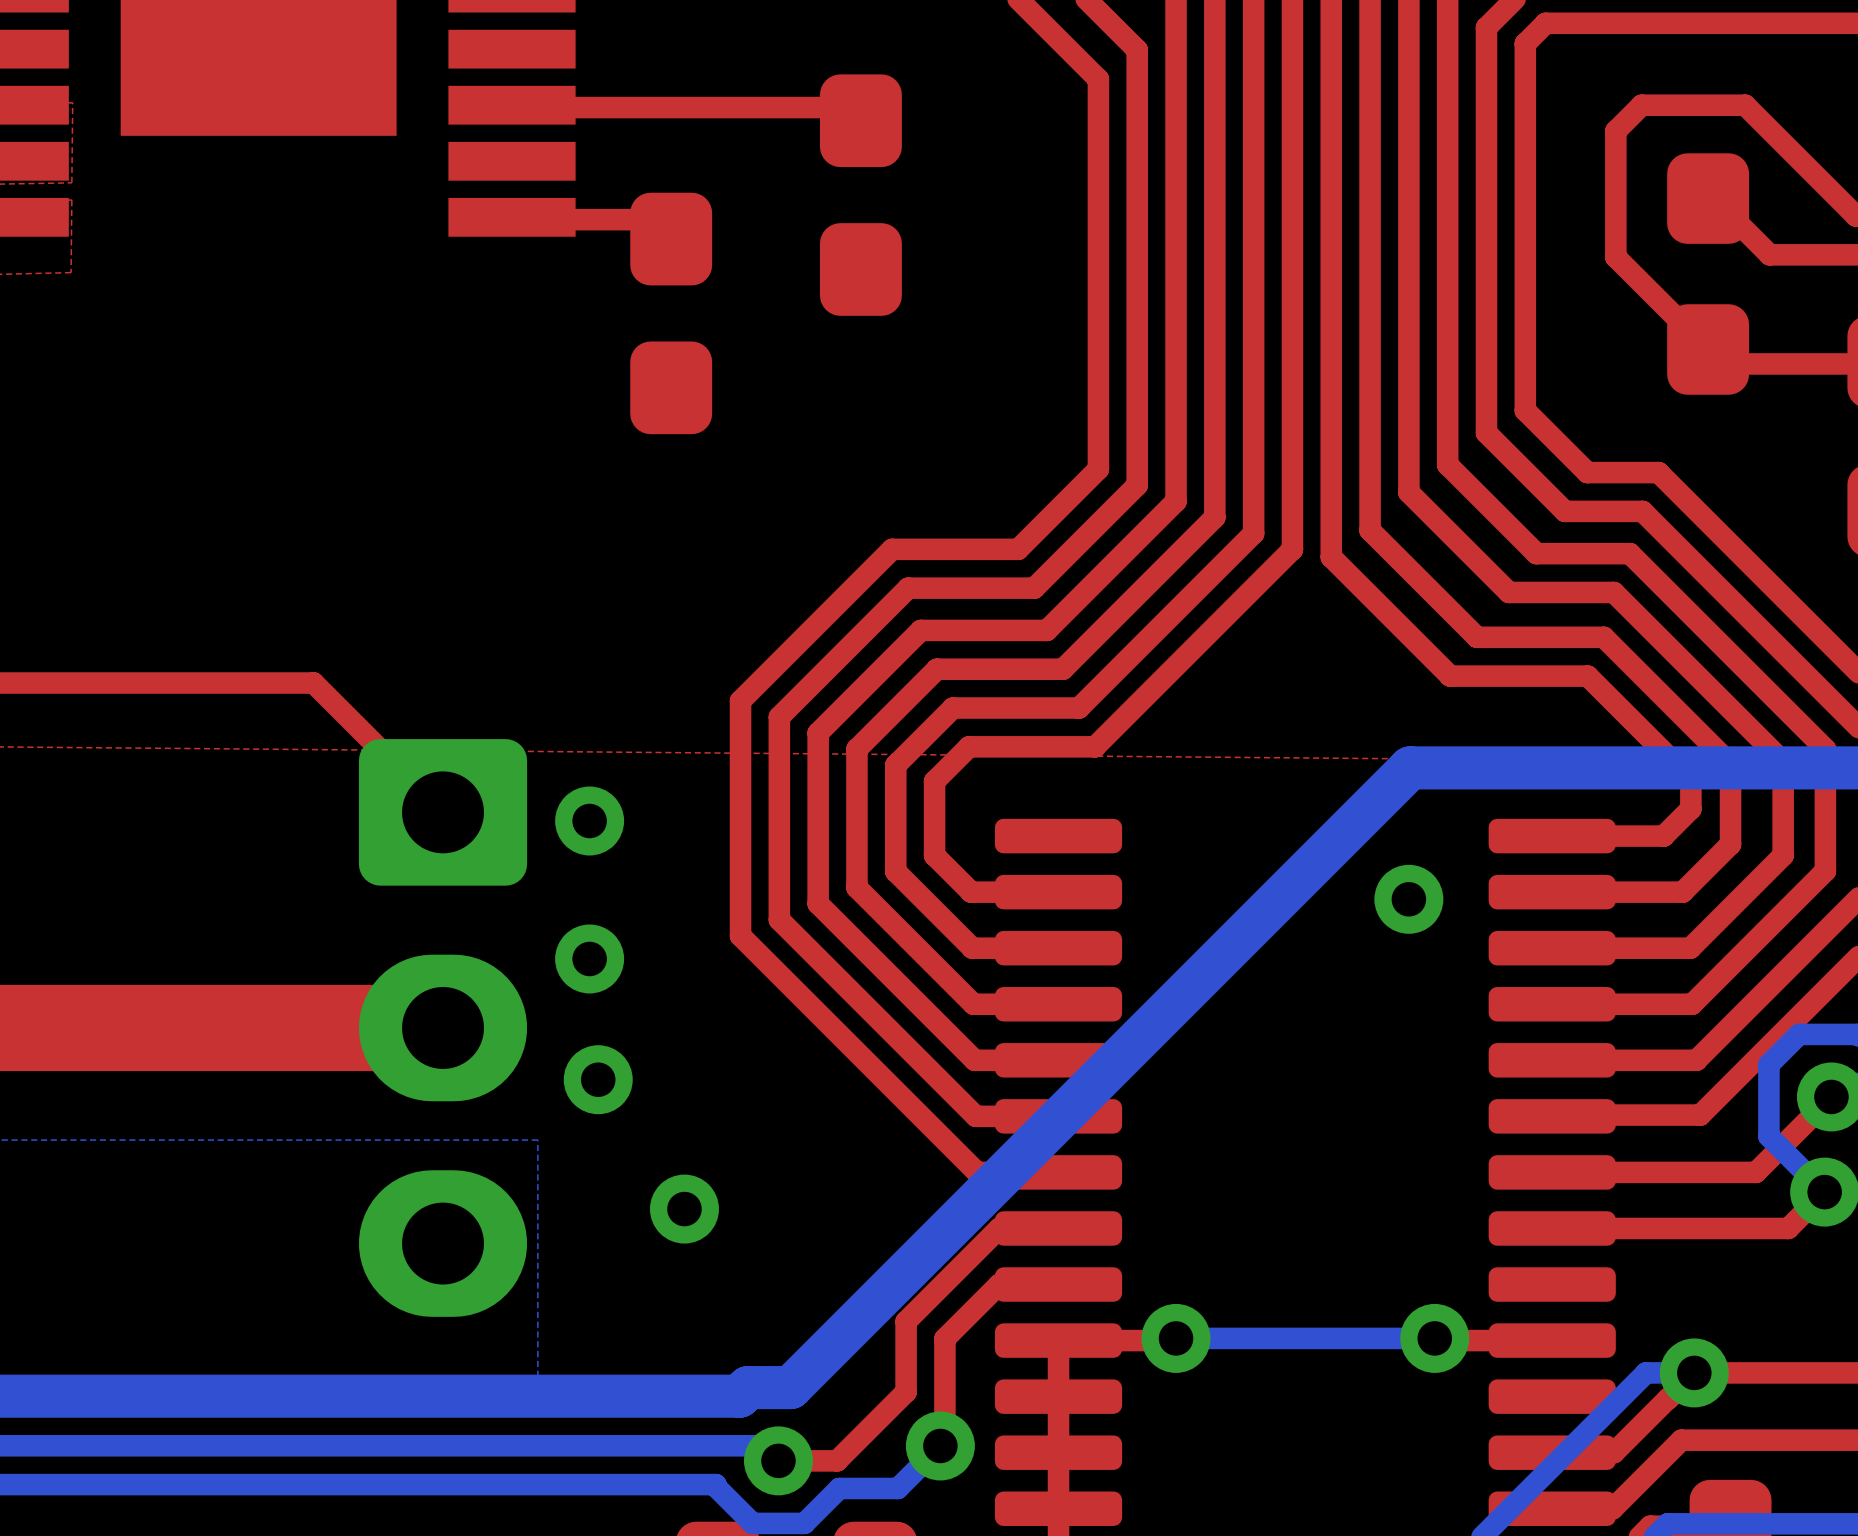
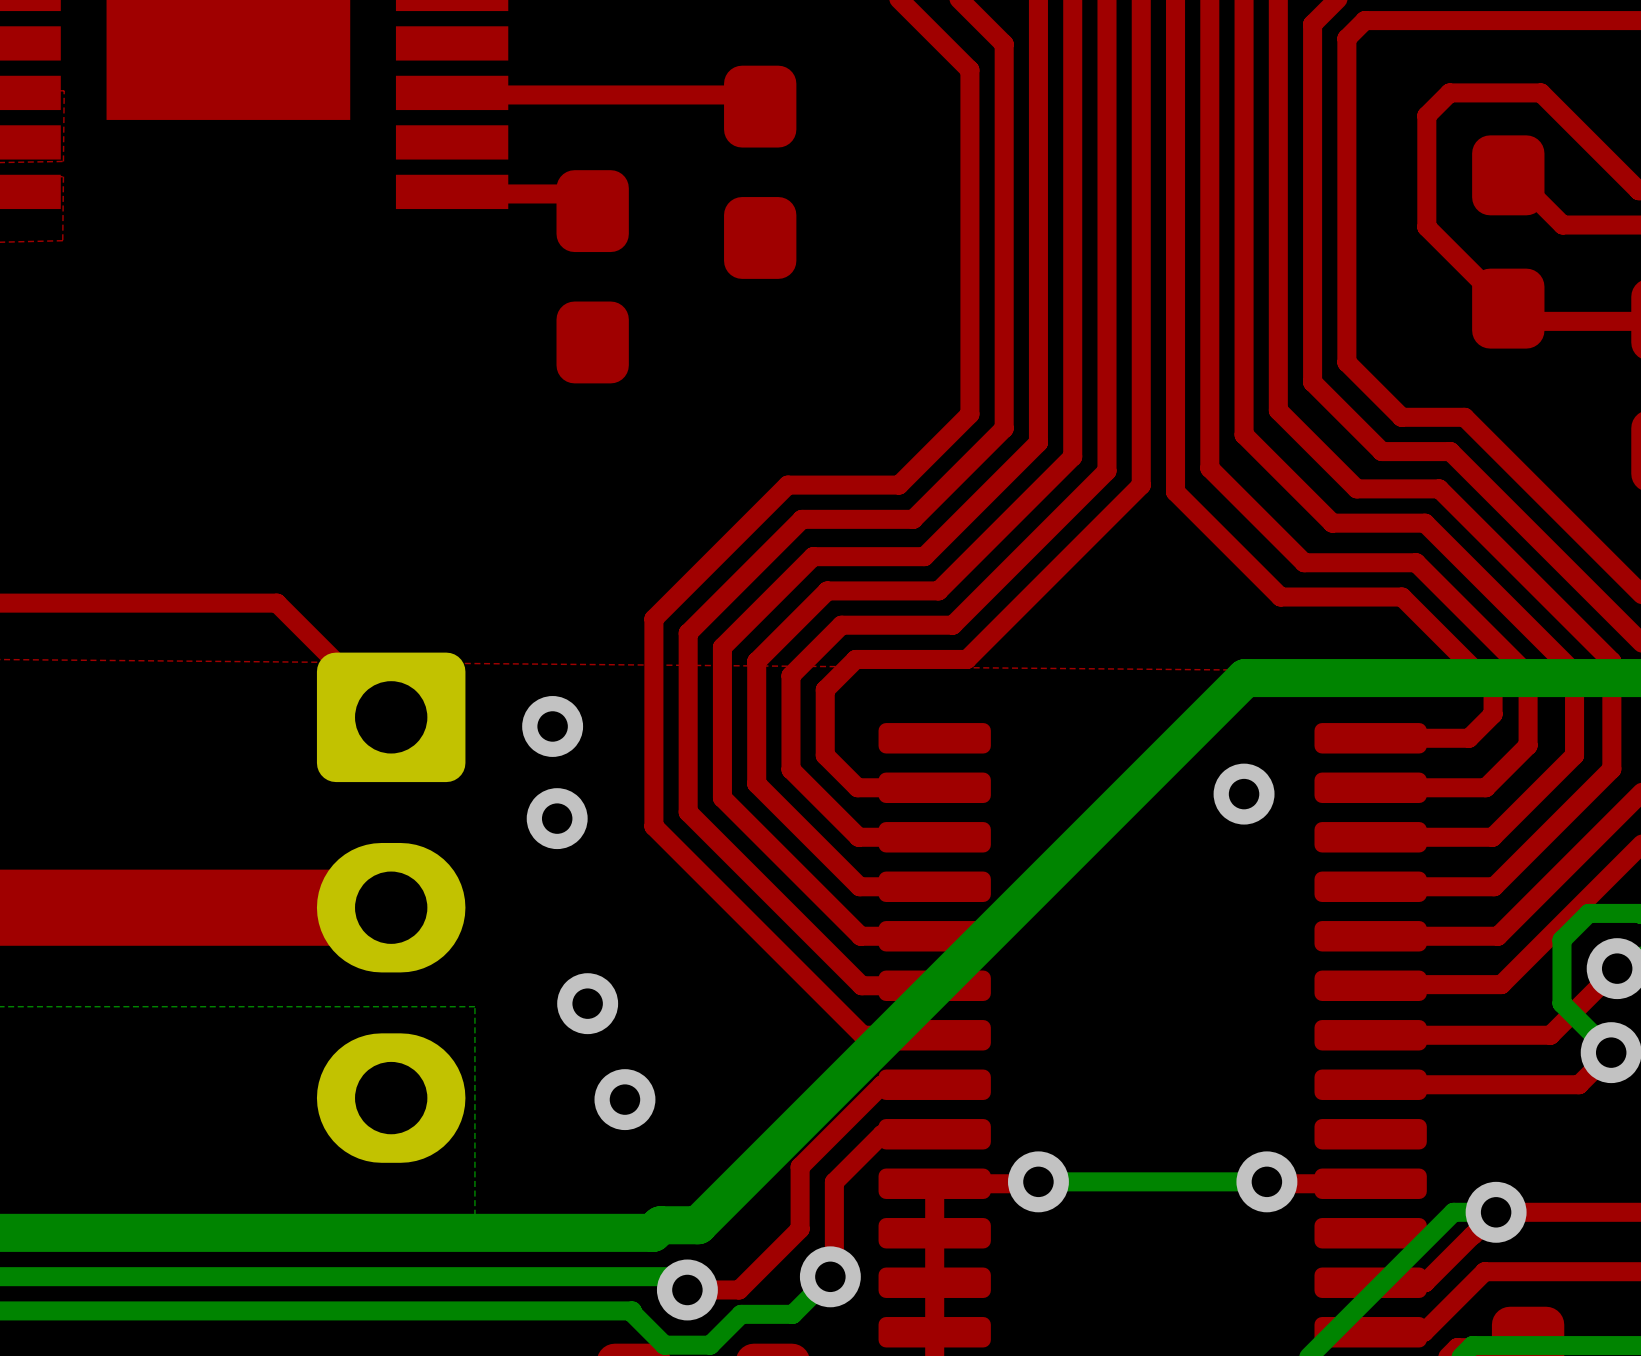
via position: (589, 821) -> (552, 726)
via position: (589, 958) -> (557, 818)
via: (598, 1079) -> none
via: none -> (587, 1003)
via position: (684, 1209) -> (624, 1099)

